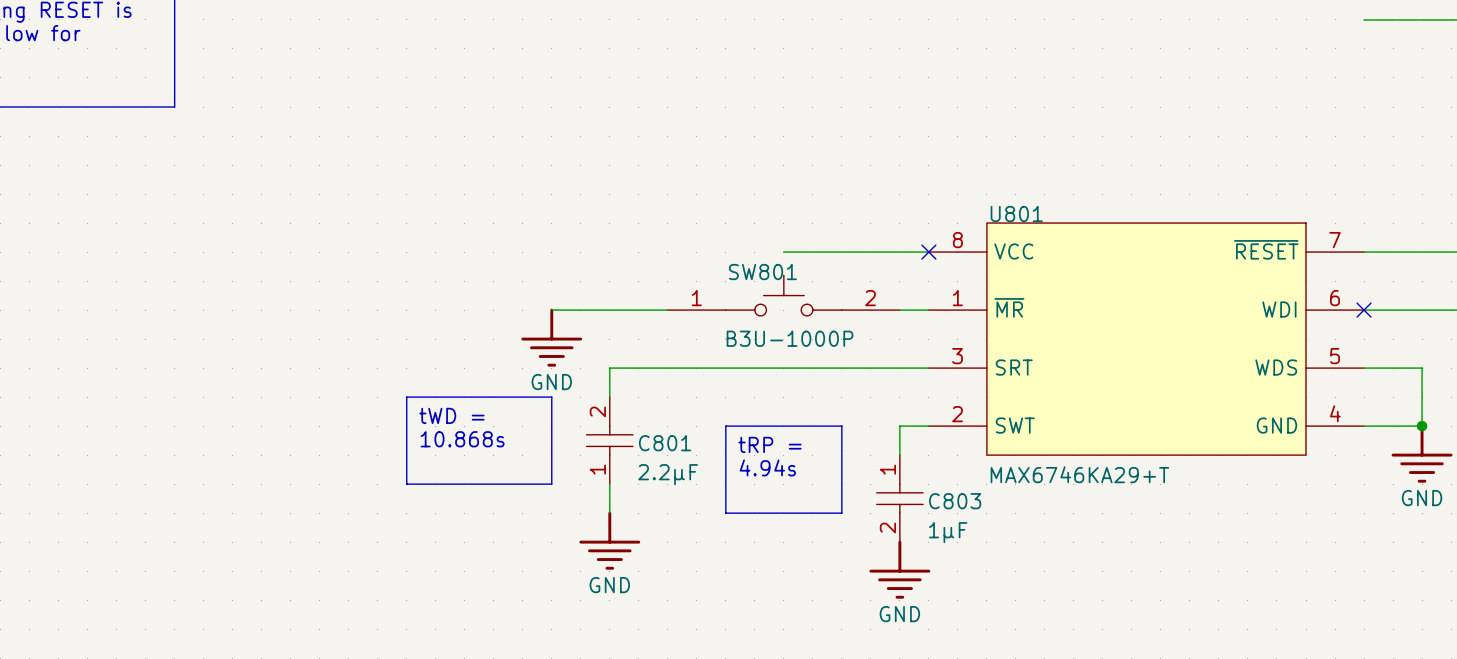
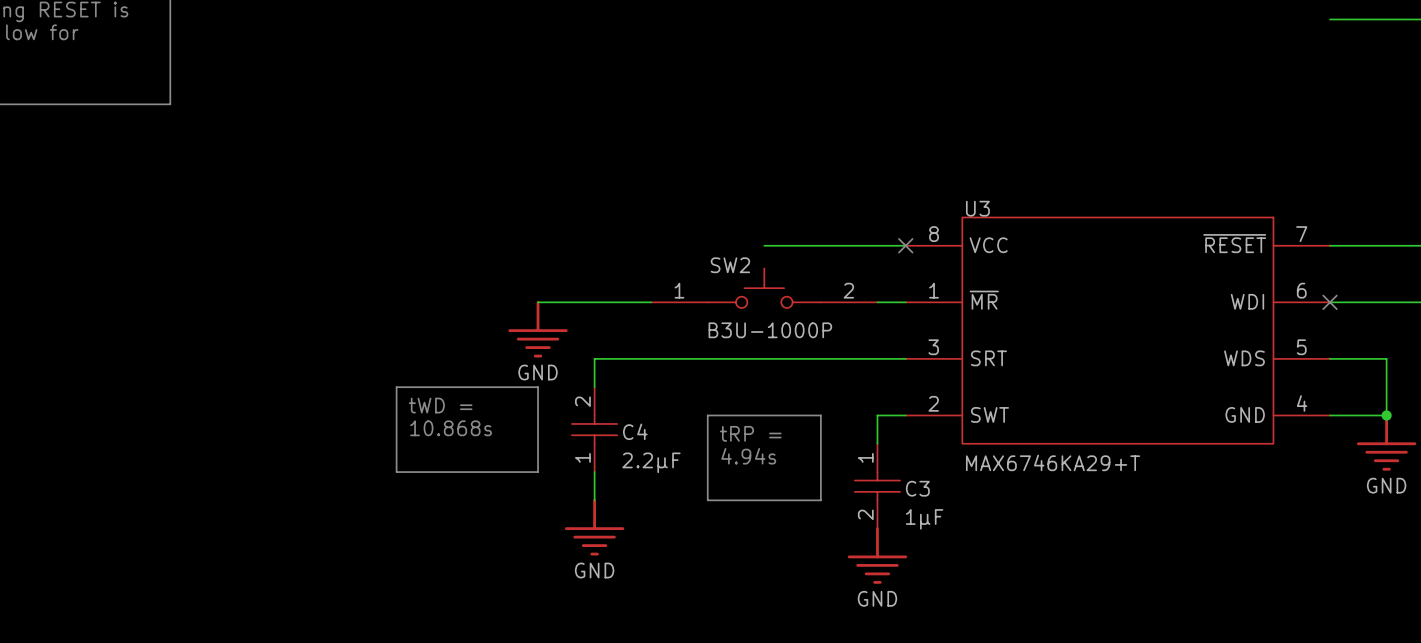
U801 name: U801 (1016, 214) -> U3 (977, 208)
SW801 name: SW801 (762, 272) -> SW2 (730, 265)
C801 name: C801 (665, 443) -> C4 (635, 431)
C803 name: C803 (955, 501) -> C3 (917, 488)

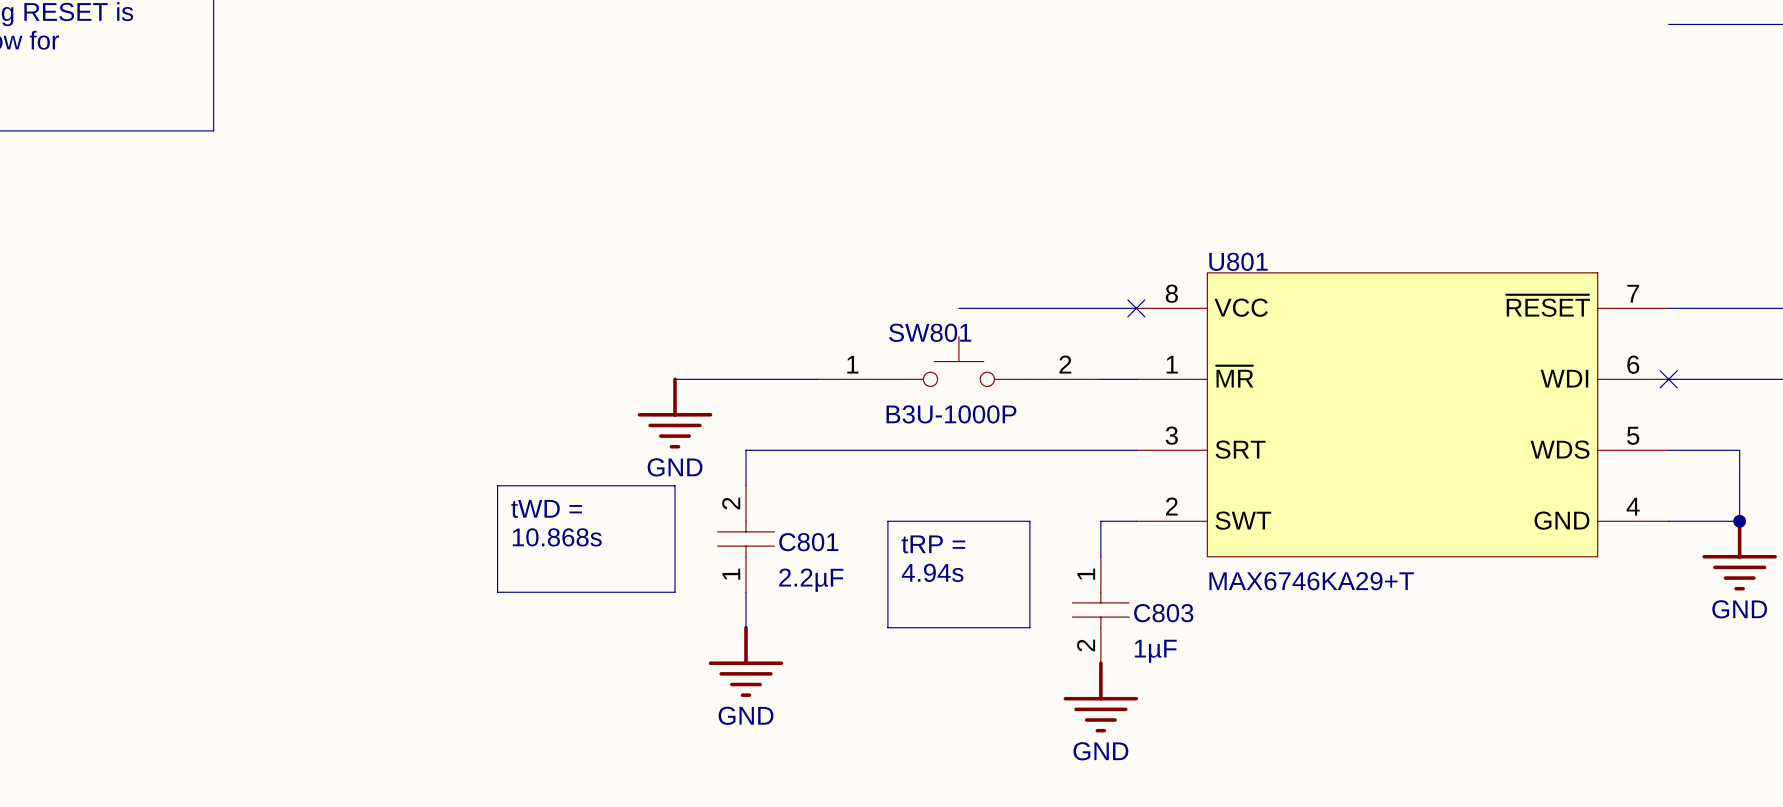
U3 name: U3 (977, 208) -> U801 (1238, 261)
SW2 name: SW2 (730, 265) -> SW801 (930, 332)
C4 name: C4 (635, 431) -> C801 (808, 542)
C3 name: C3 (917, 488) -> C803 (1163, 613)

